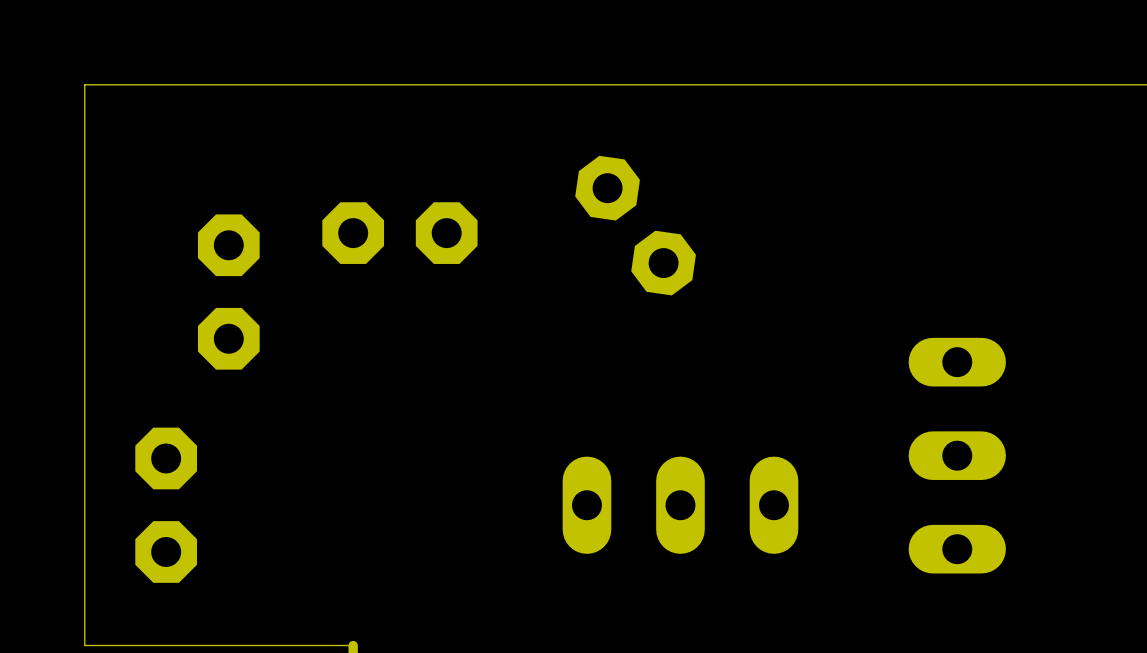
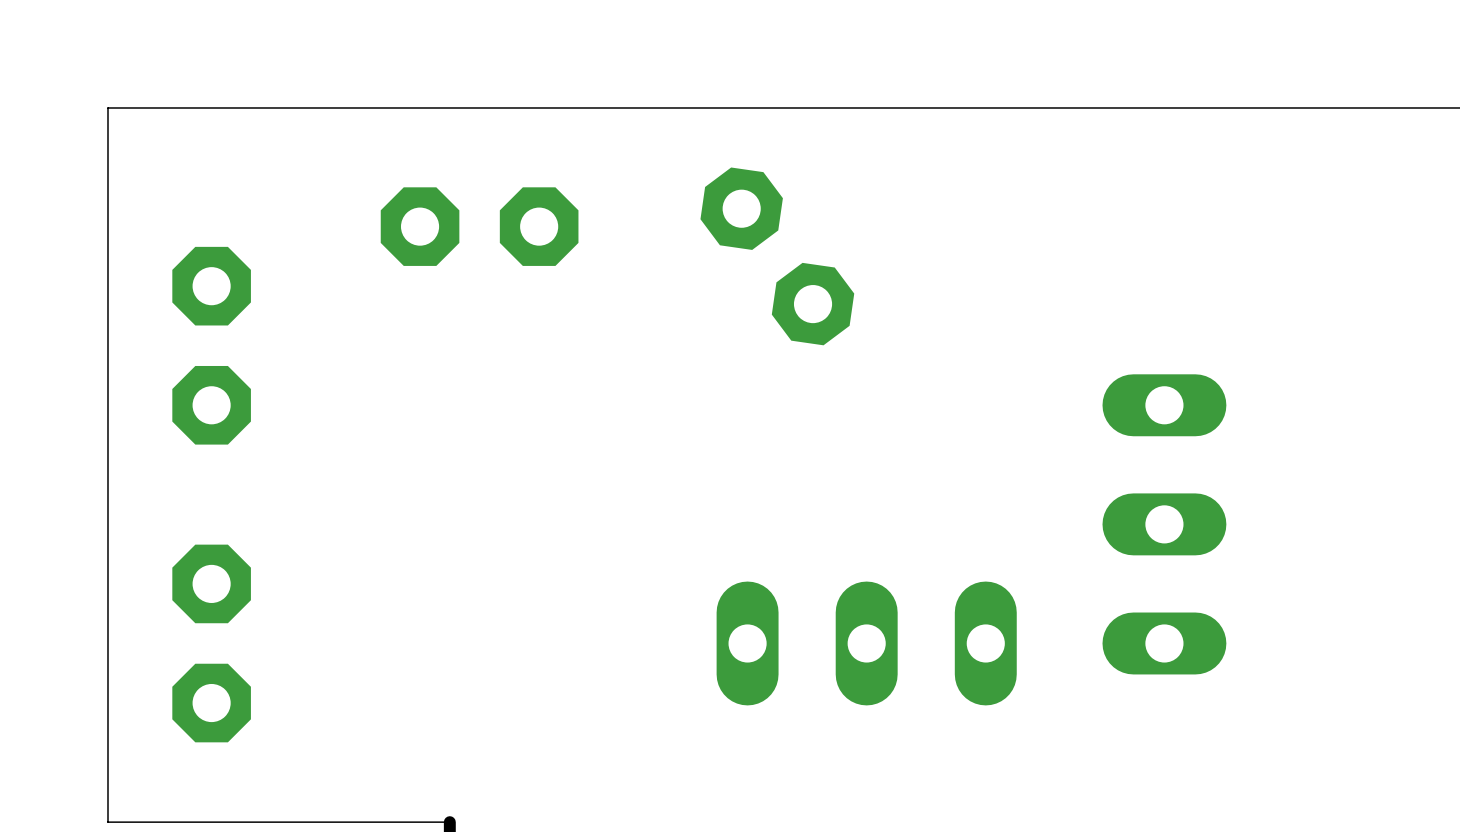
part position: (635, 225) -> (777, 256)
part position: (399, 233) -> (479, 226)
part position: (228, 292) -> (211, 345)
part position: (957, 455) -> (1164, 524)

